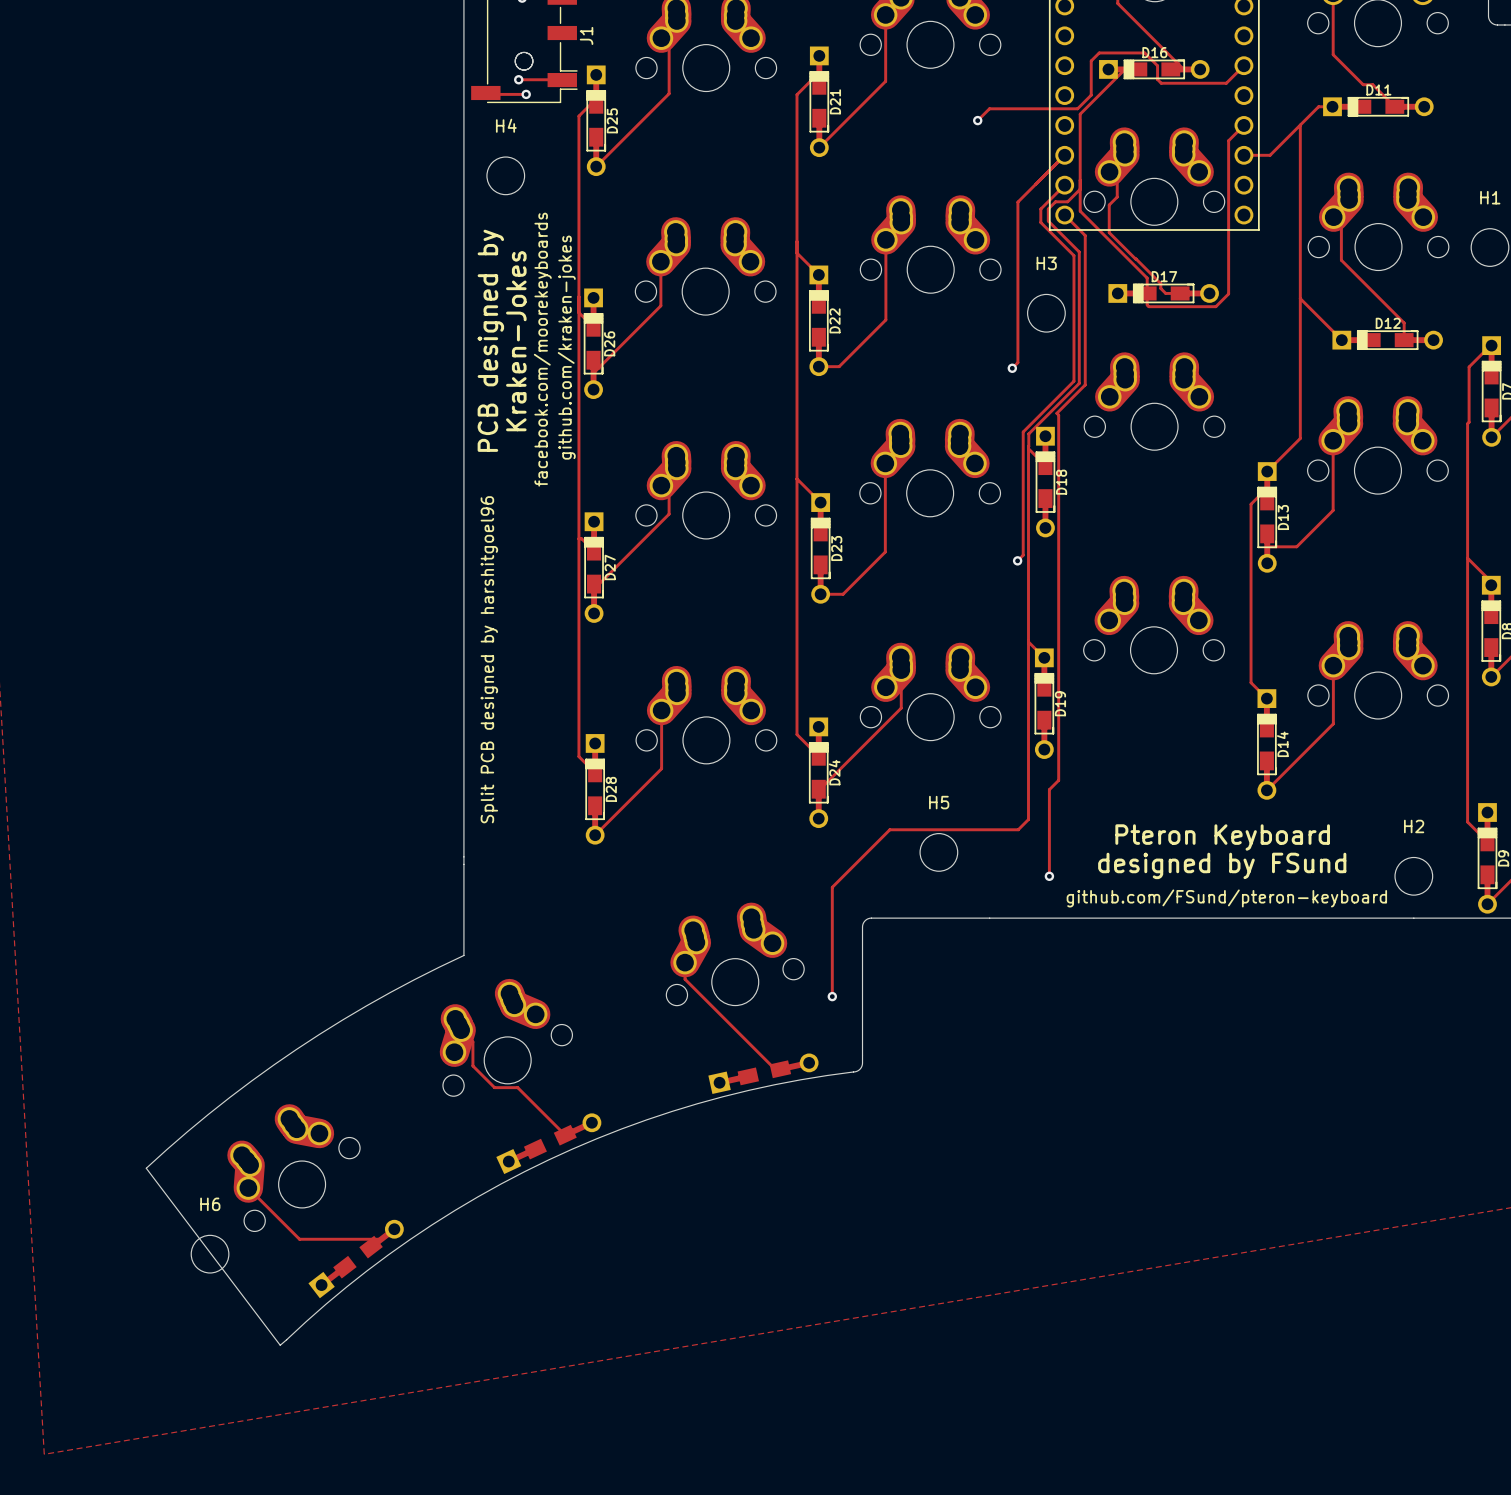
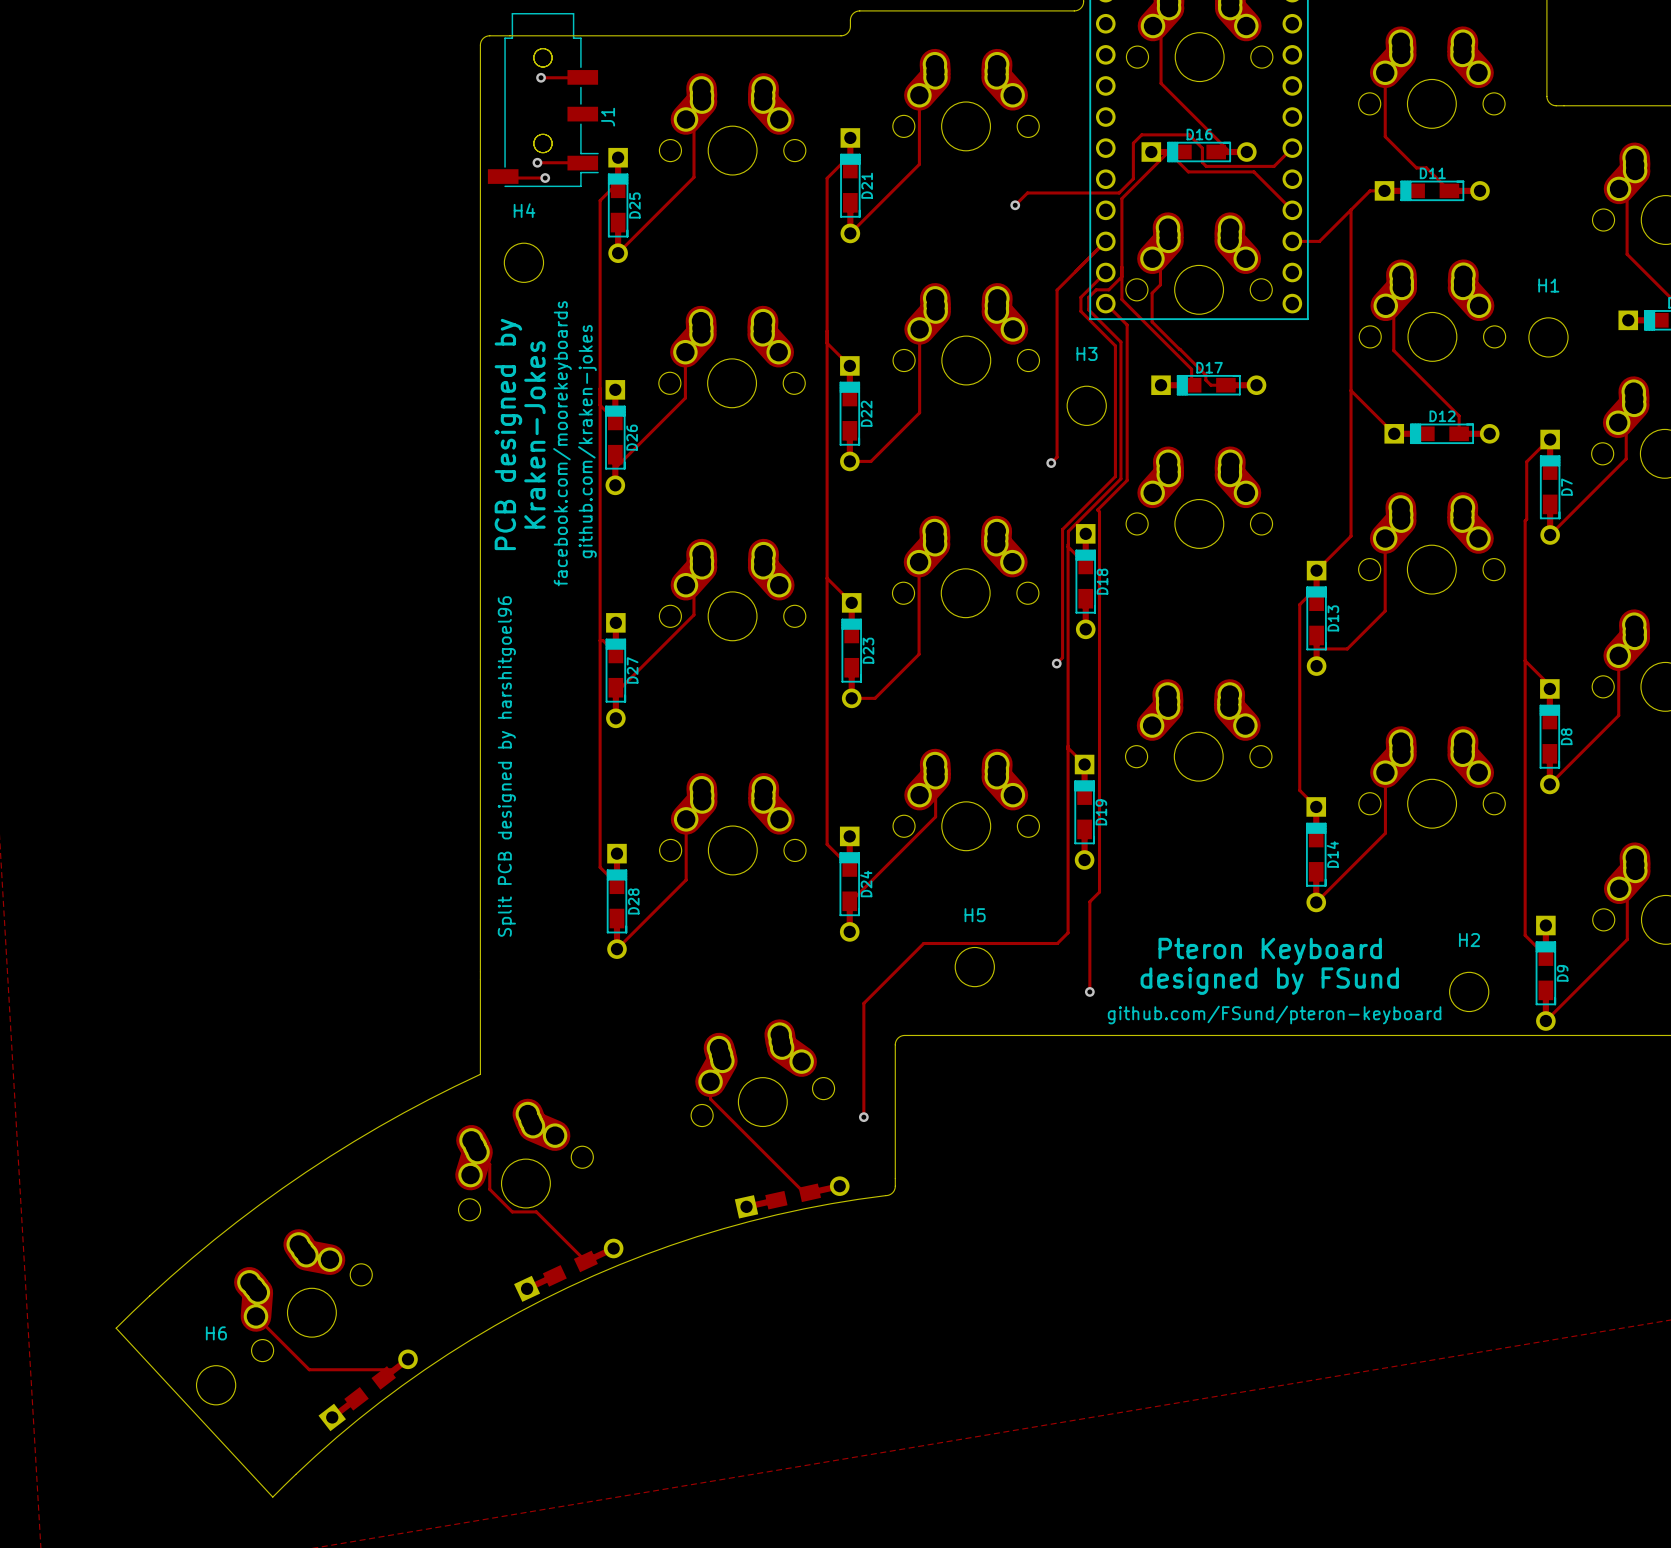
track: (1243, 125) (1228, 140) (1228, 293) (1215, 306) (1148, 306) (1147, 293) -> (1292, 210) (1253, 171) (1188, 171) (1168, 152)
board edge: (146, 1168) (280, 1345) (286, 1339) -> (149, 1295) (116, 1328) (272, 1497) (295, 1474)

